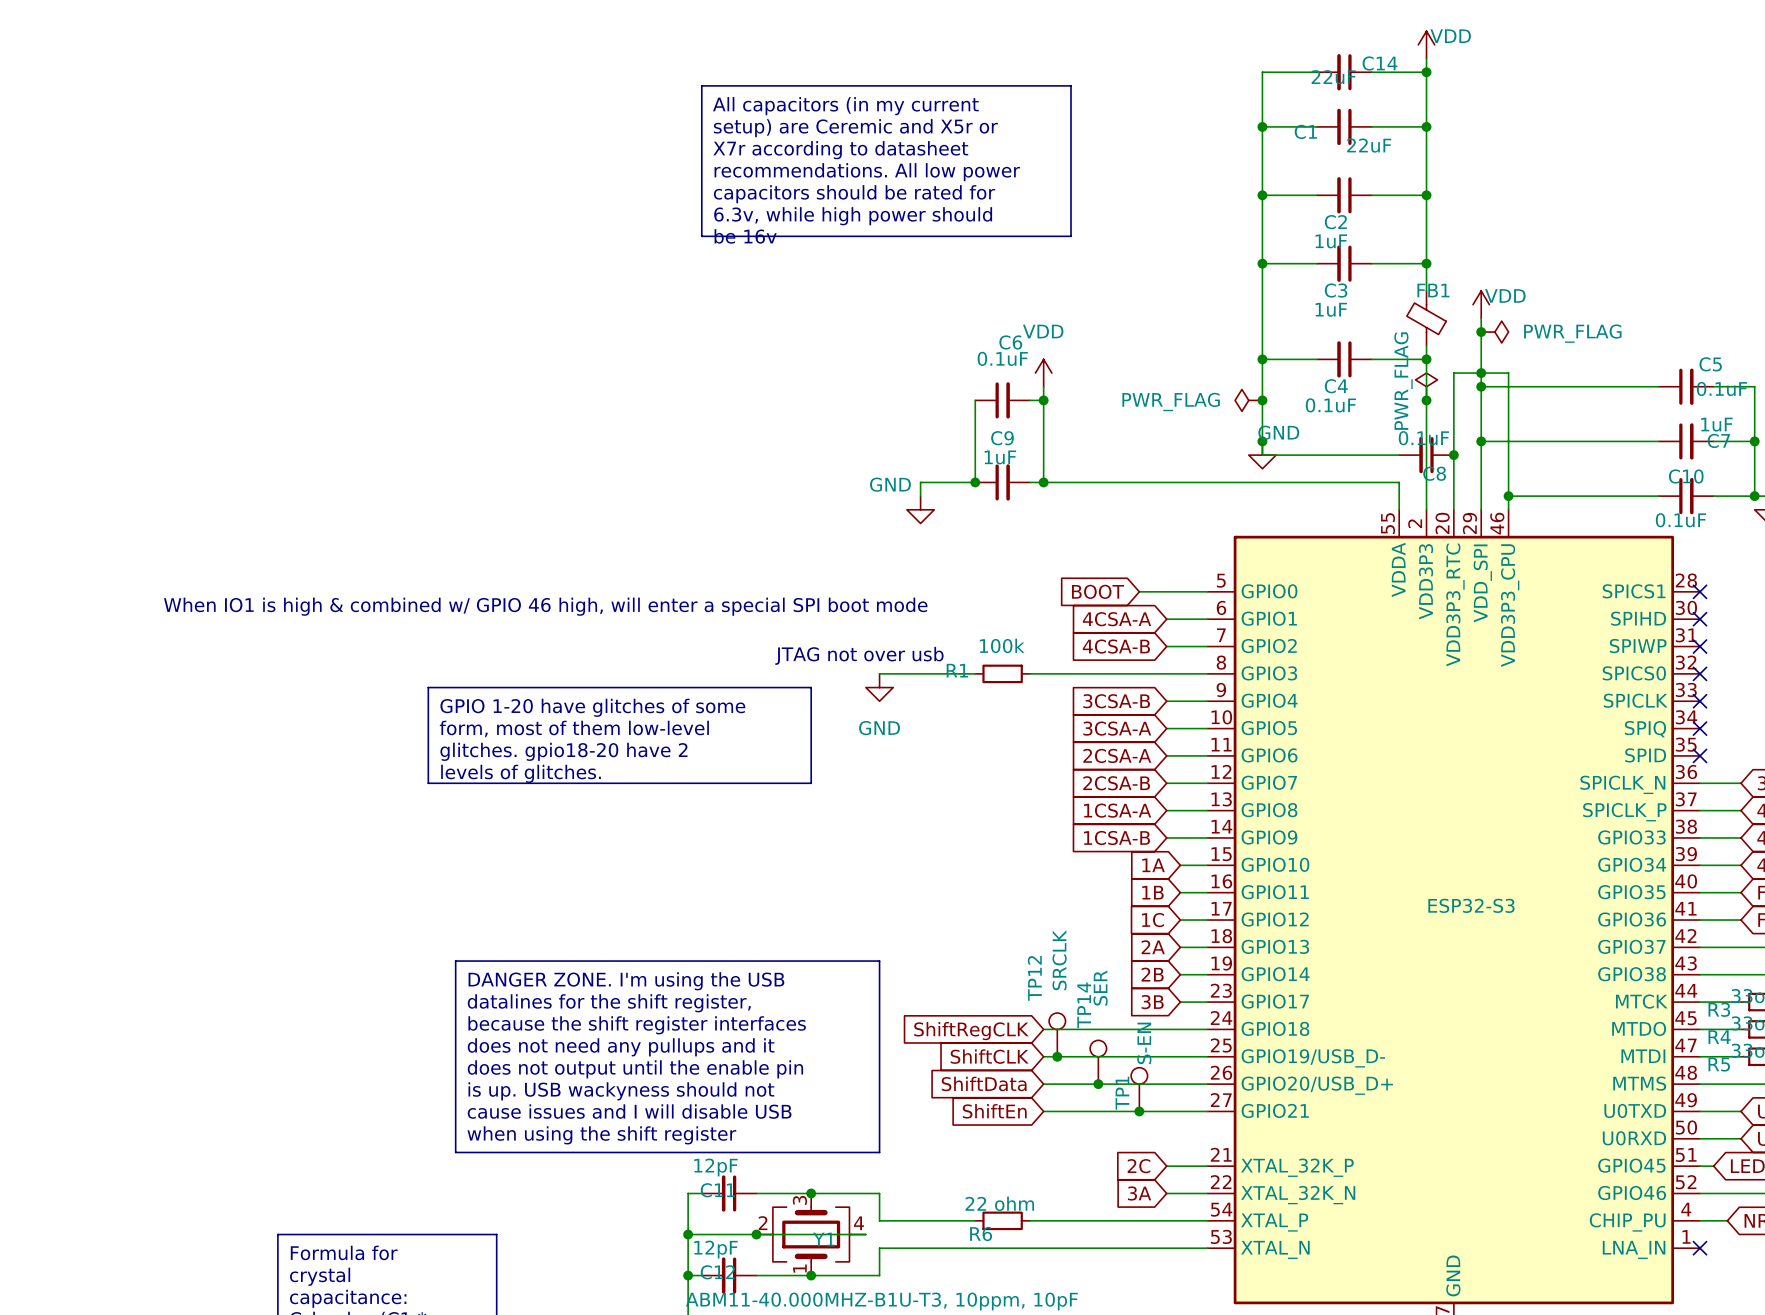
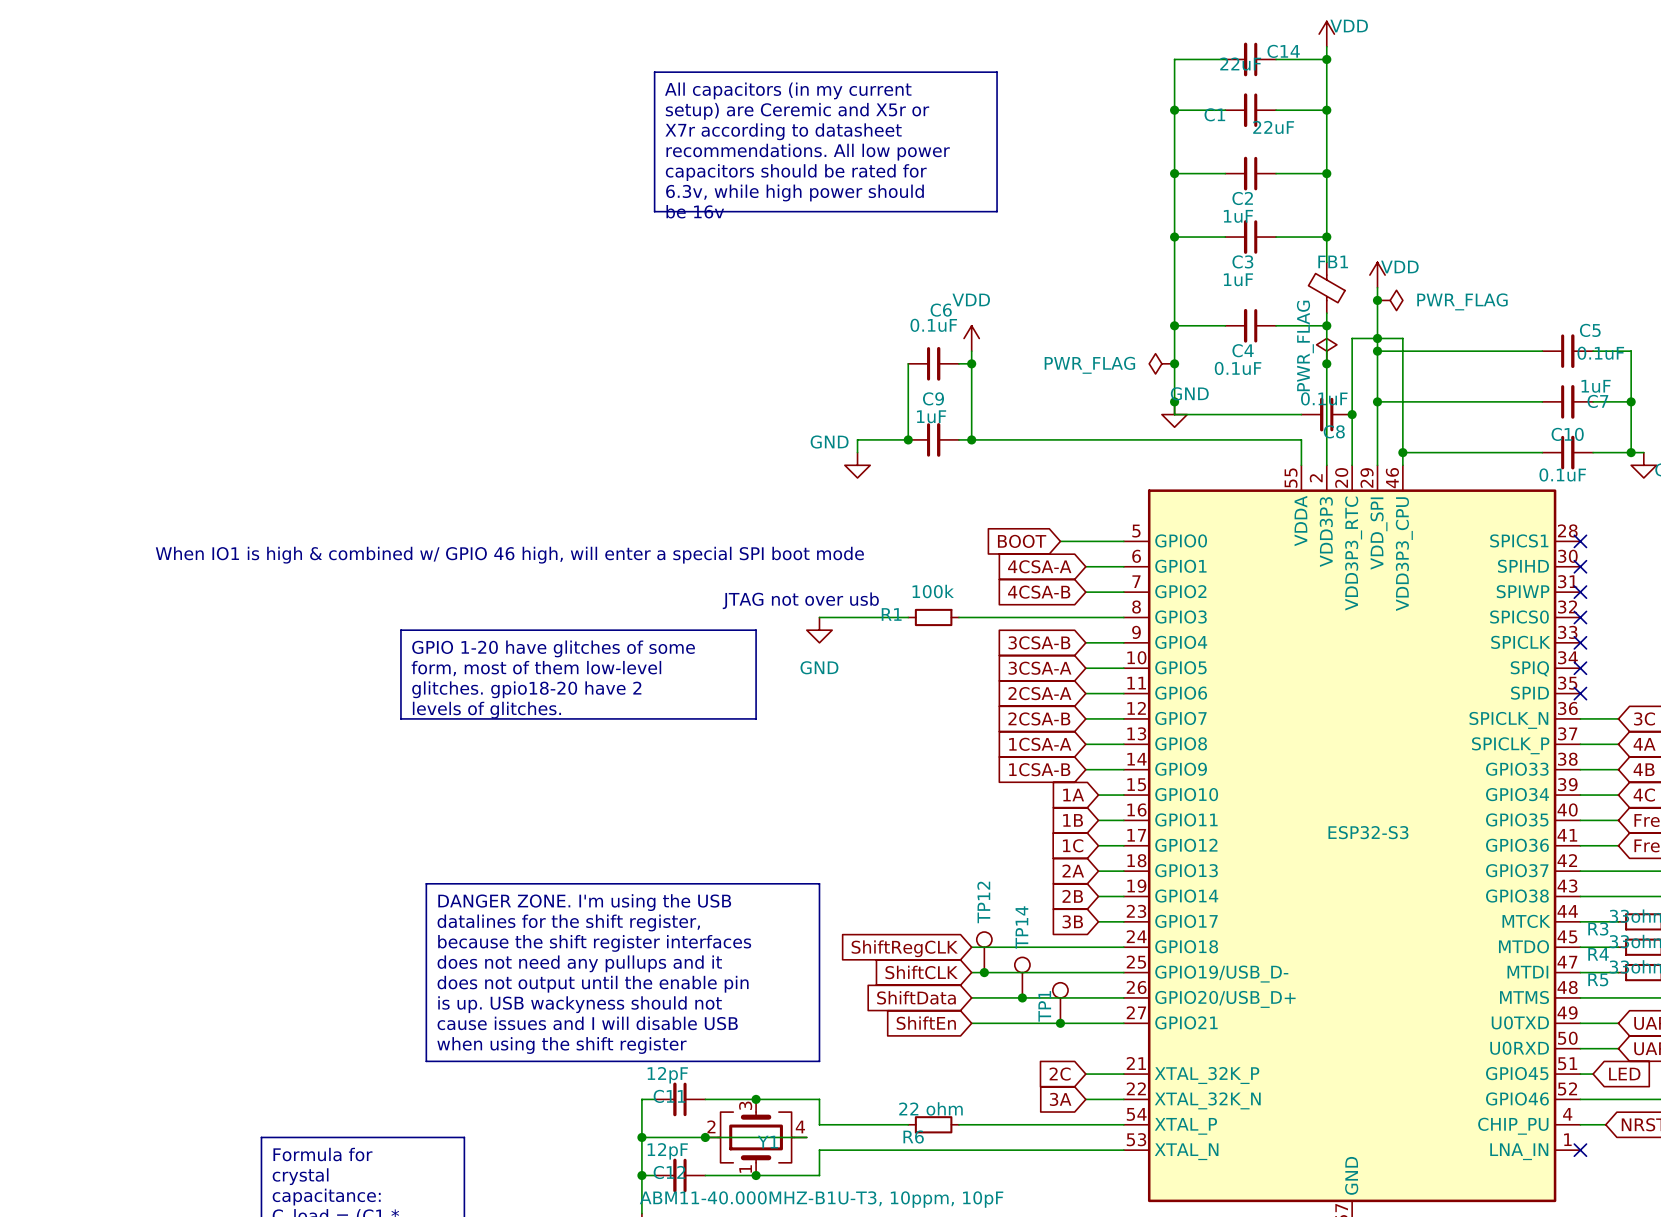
TP12 value: SRCLK (1059, 960) -> none
TP12 name position: TP12 (1034, 978) -> TP12 (983, 902)
TP14 value: SER (1100, 988) -> none
TP14 name position: TP14 (1084, 1005) -> TP14 (1021, 927)
TP1 value: S-EN (1144, 1043) -> none

